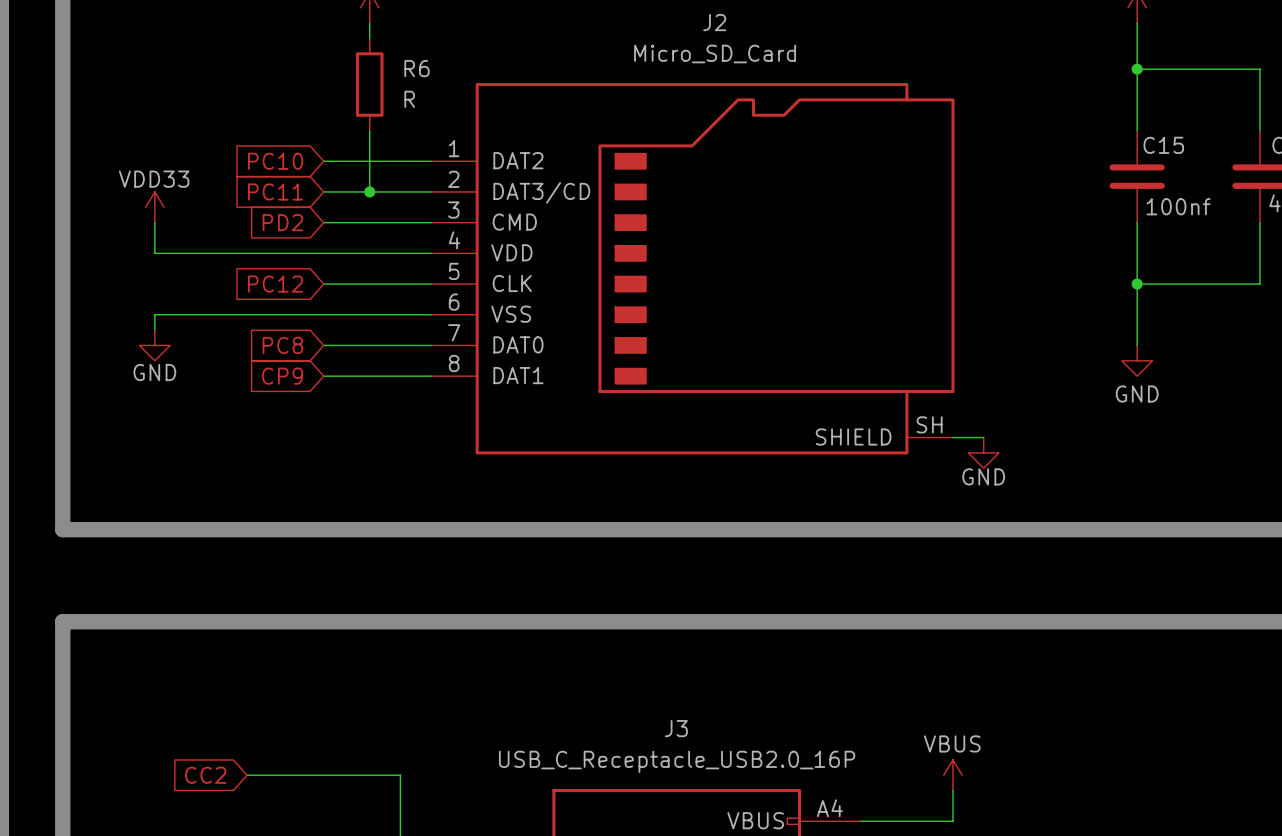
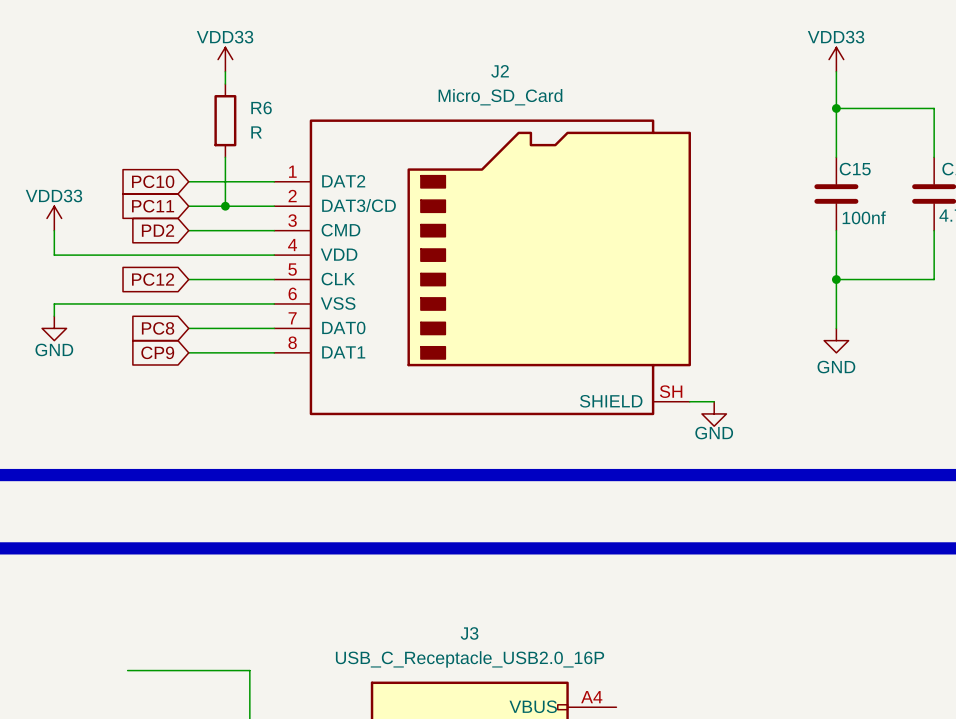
global label: CC2 (205, 775) -> none
power symbol: VBUS (952, 775) -> none
wire: (952, 790) (952, 821) (860, 821) -> none

